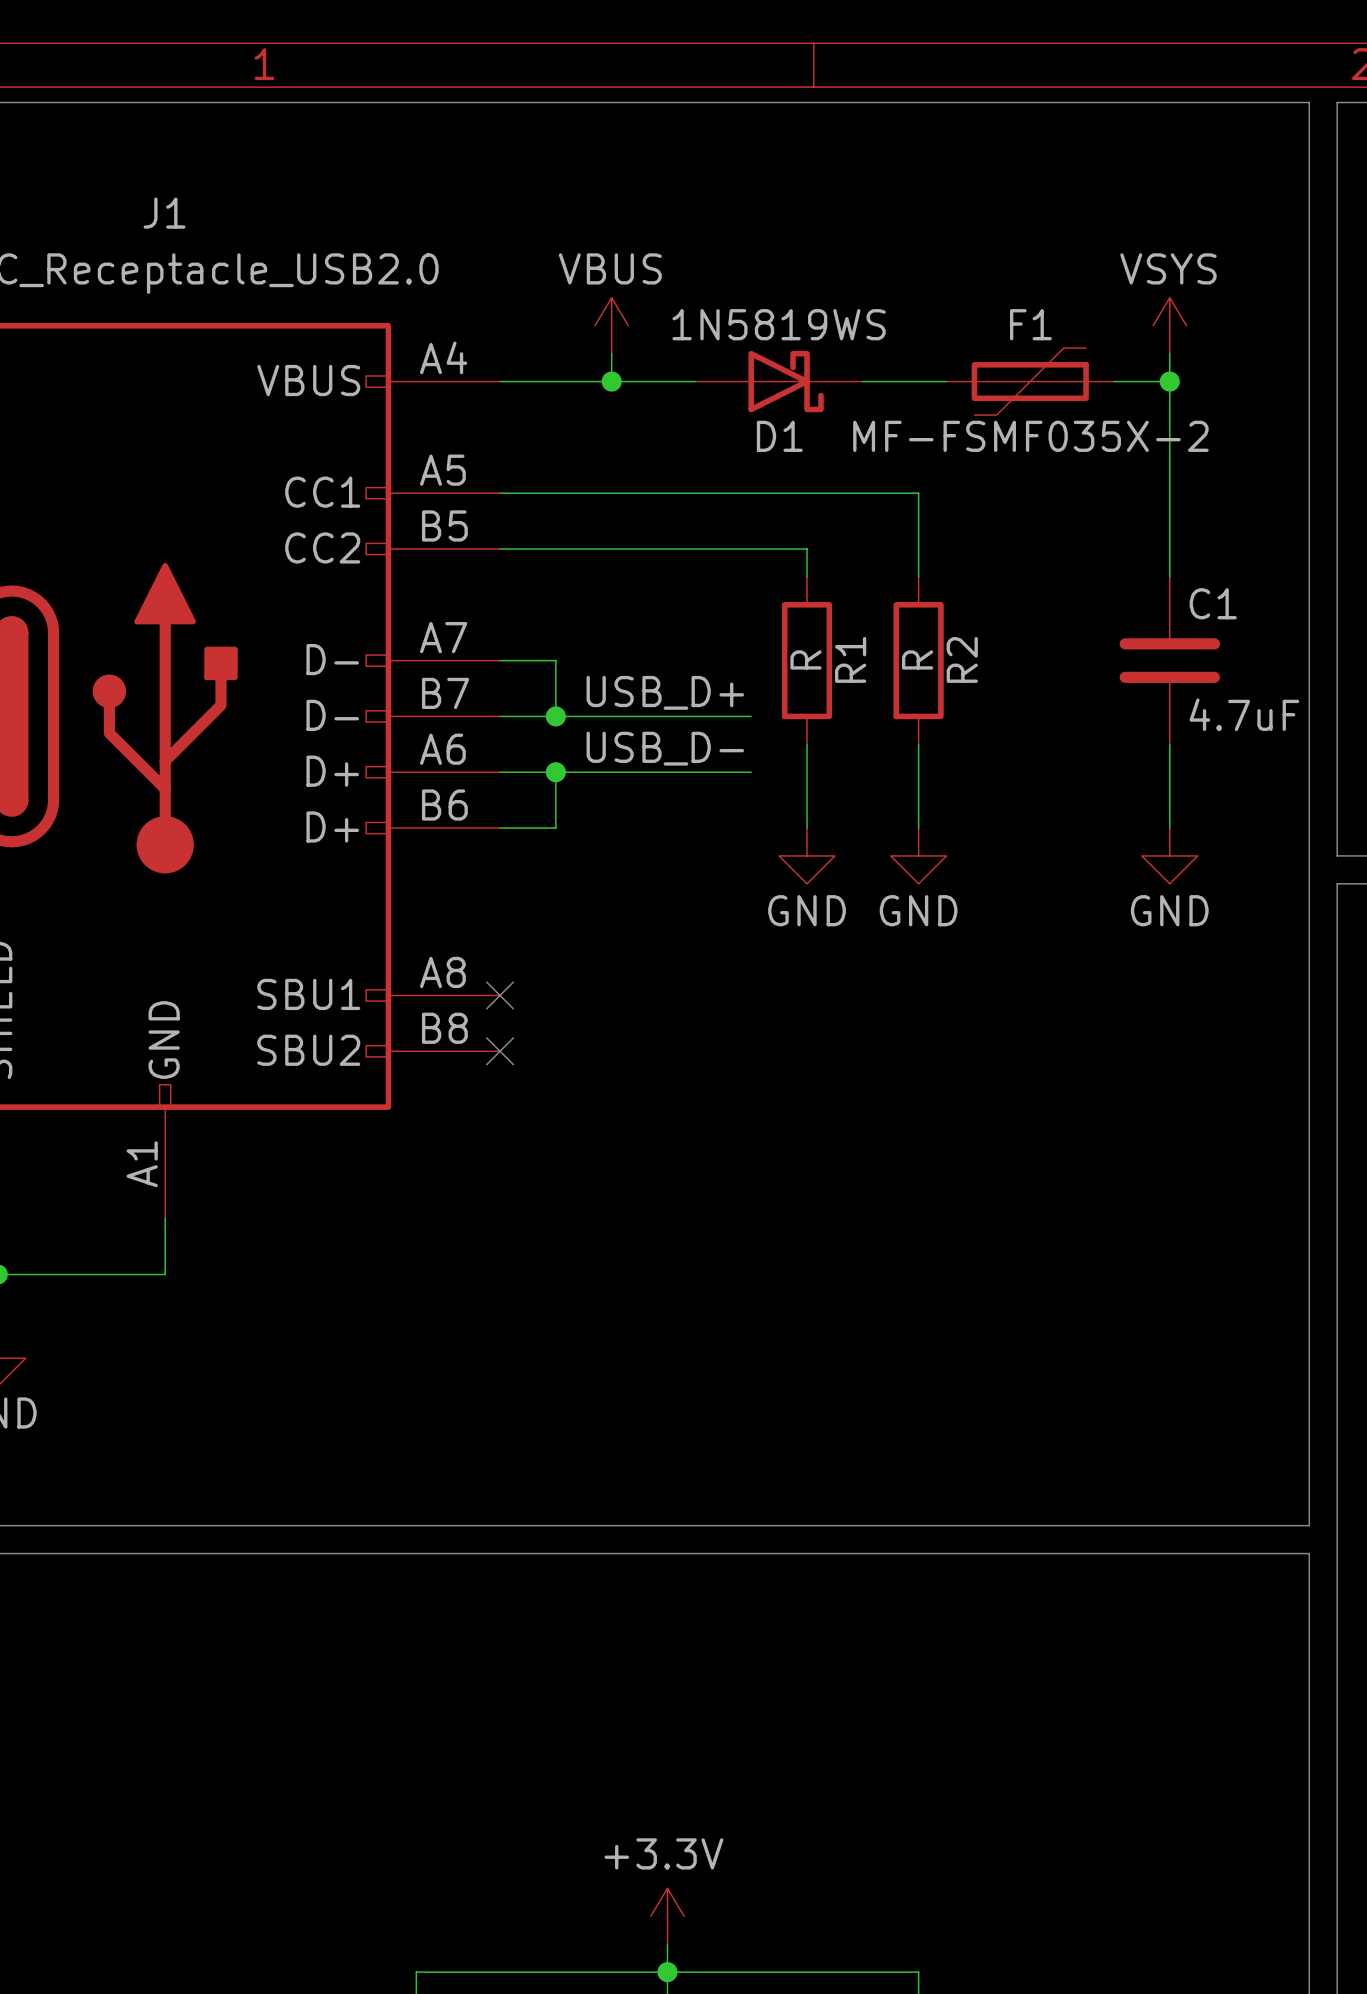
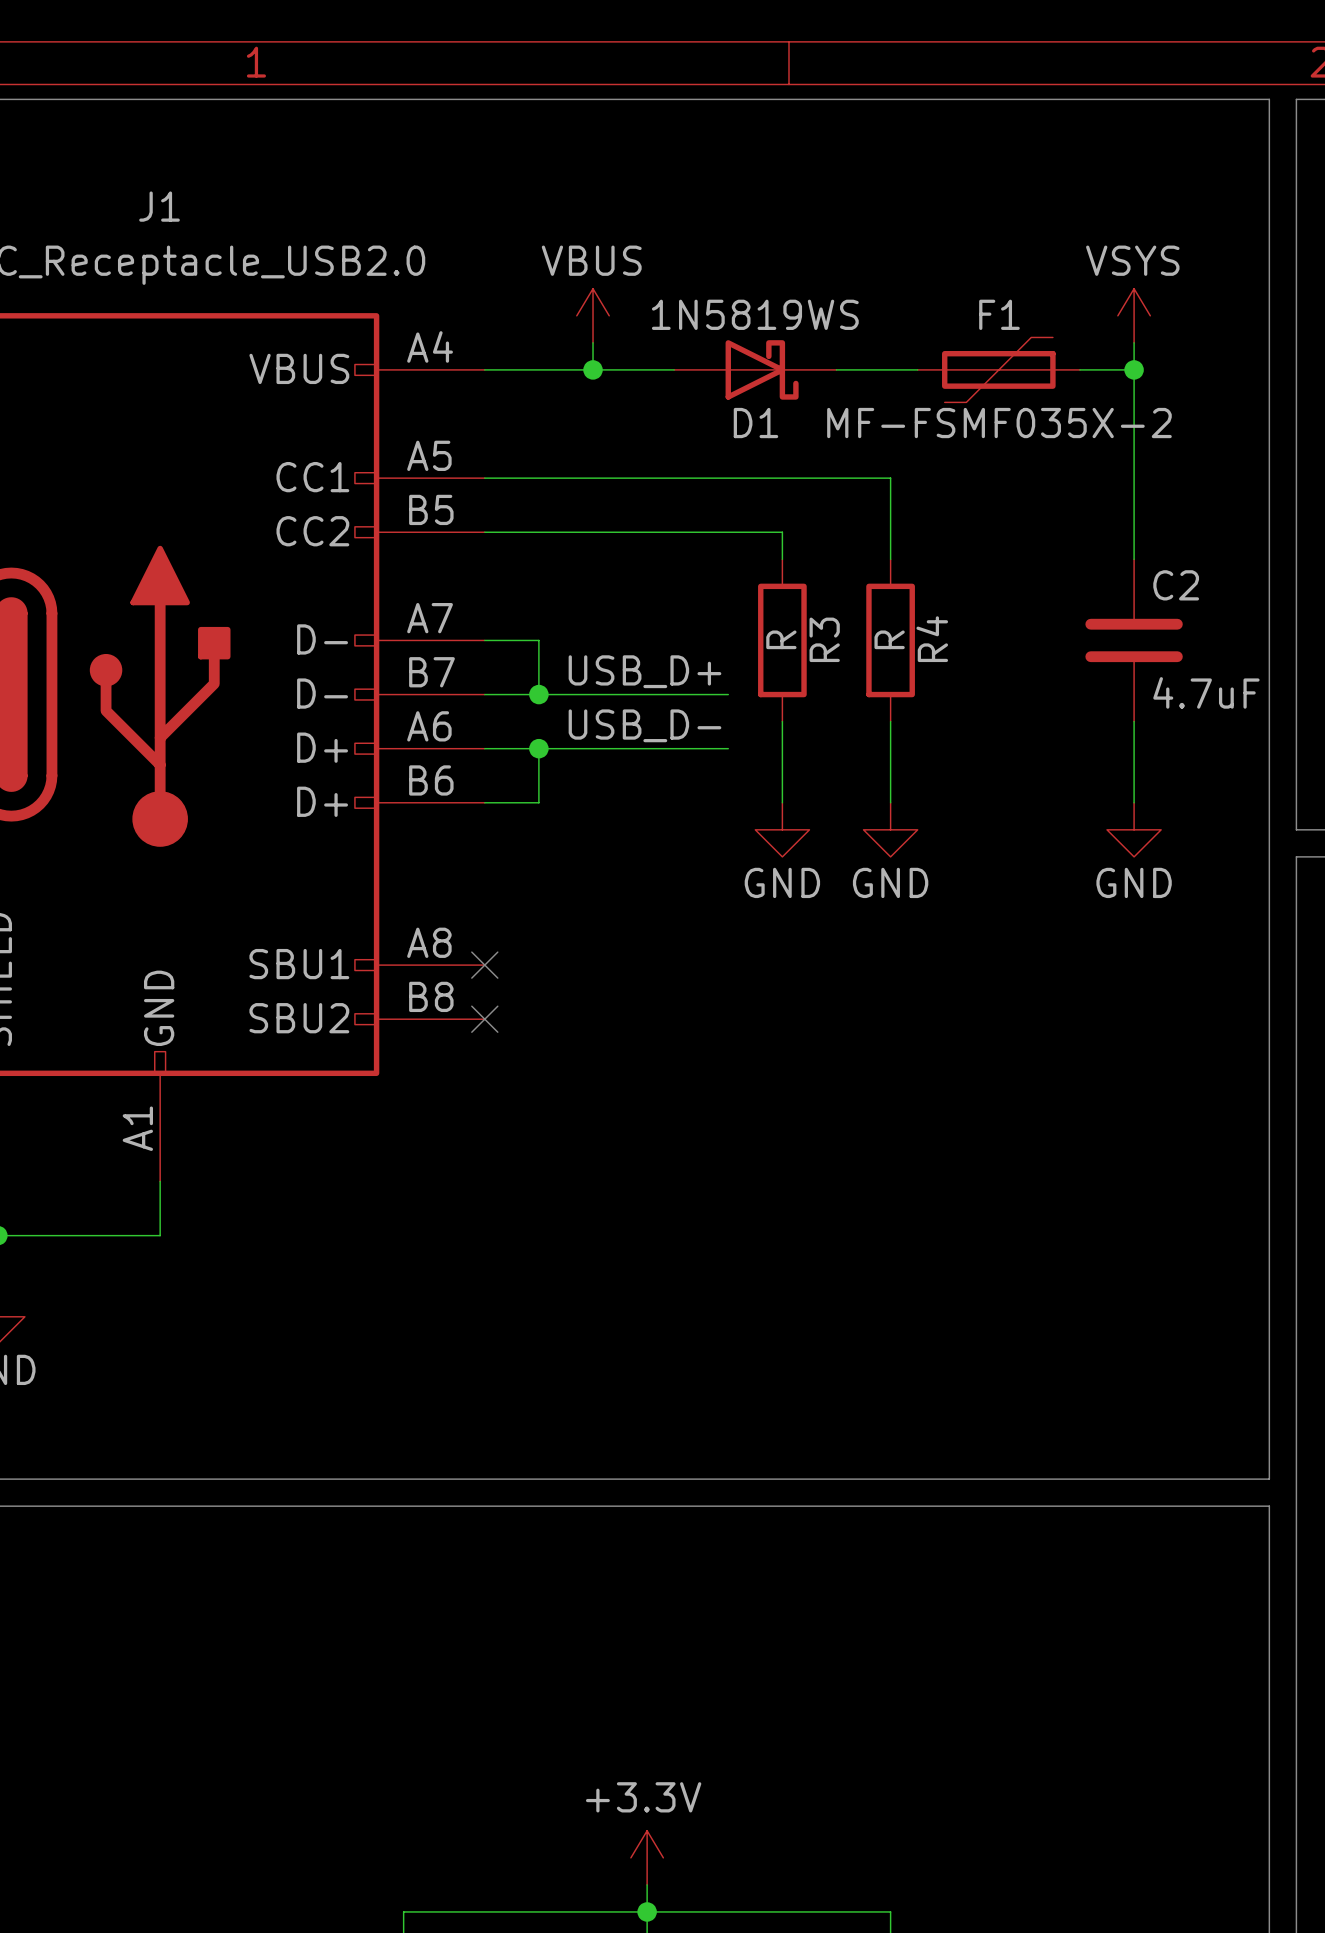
C1 name: C1 (1213, 603) -> C2 (1176, 585)
R1 name: R1 (850, 659) -> R3 (824, 639)
R2 name: R2 (962, 659) -> R4 (932, 639)

